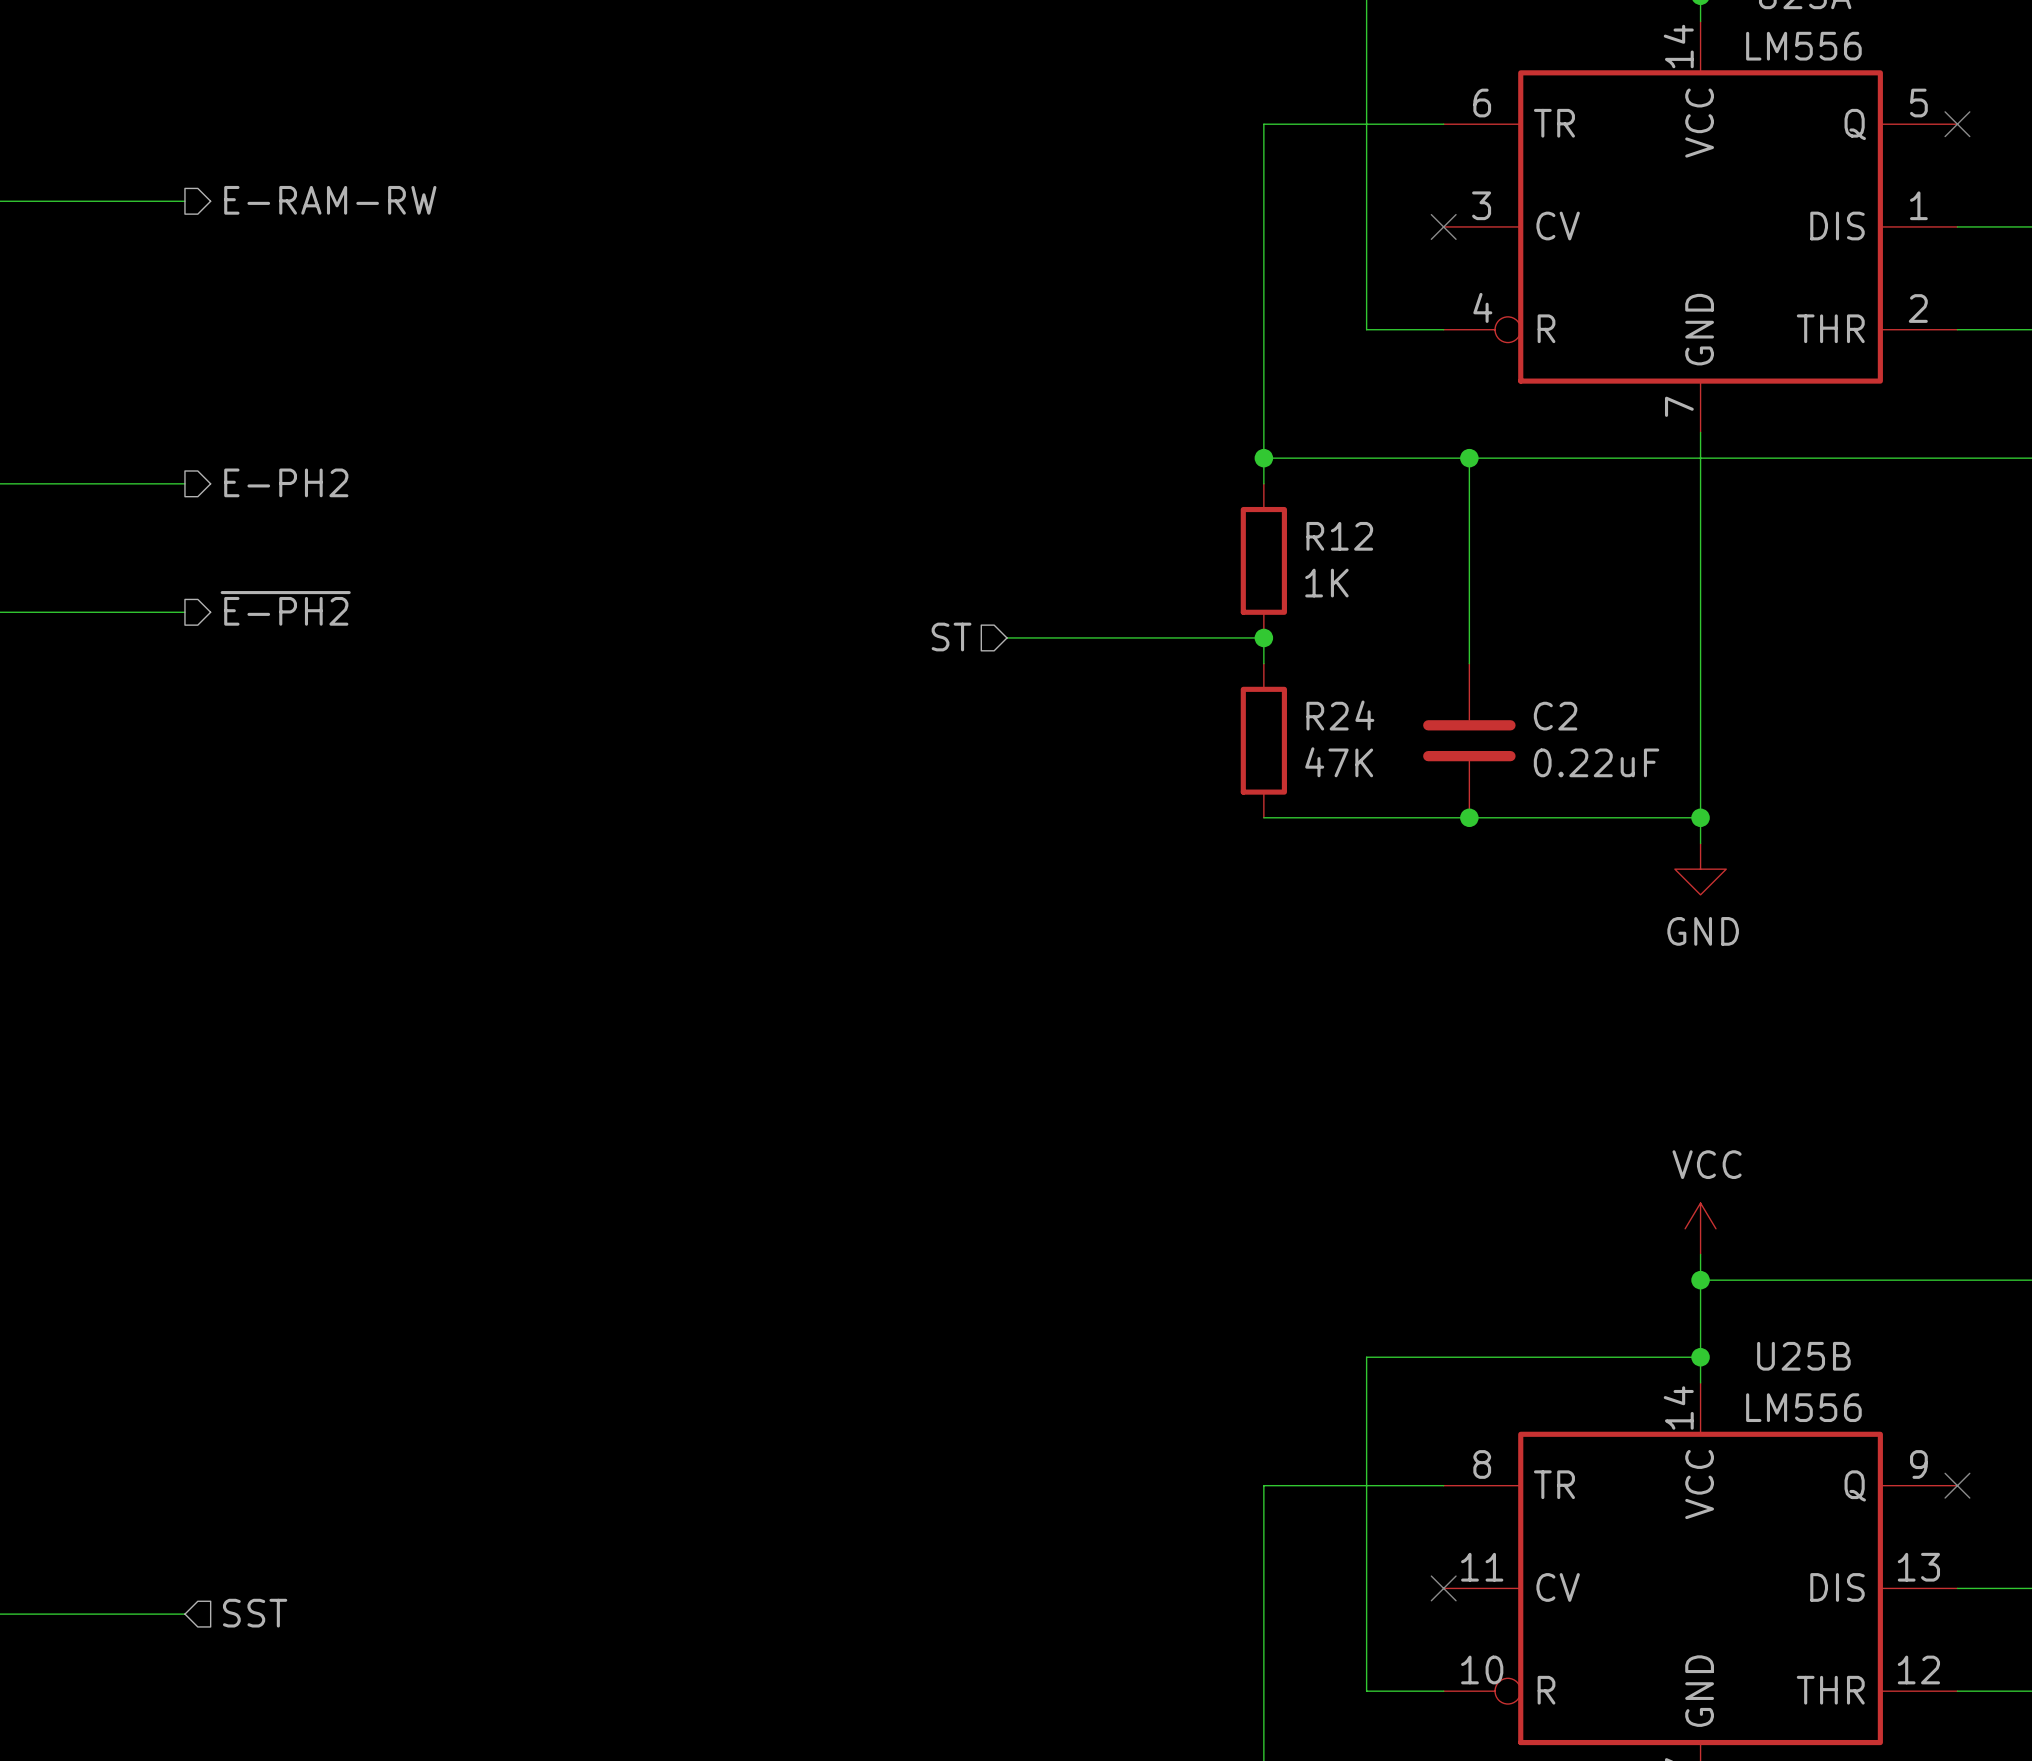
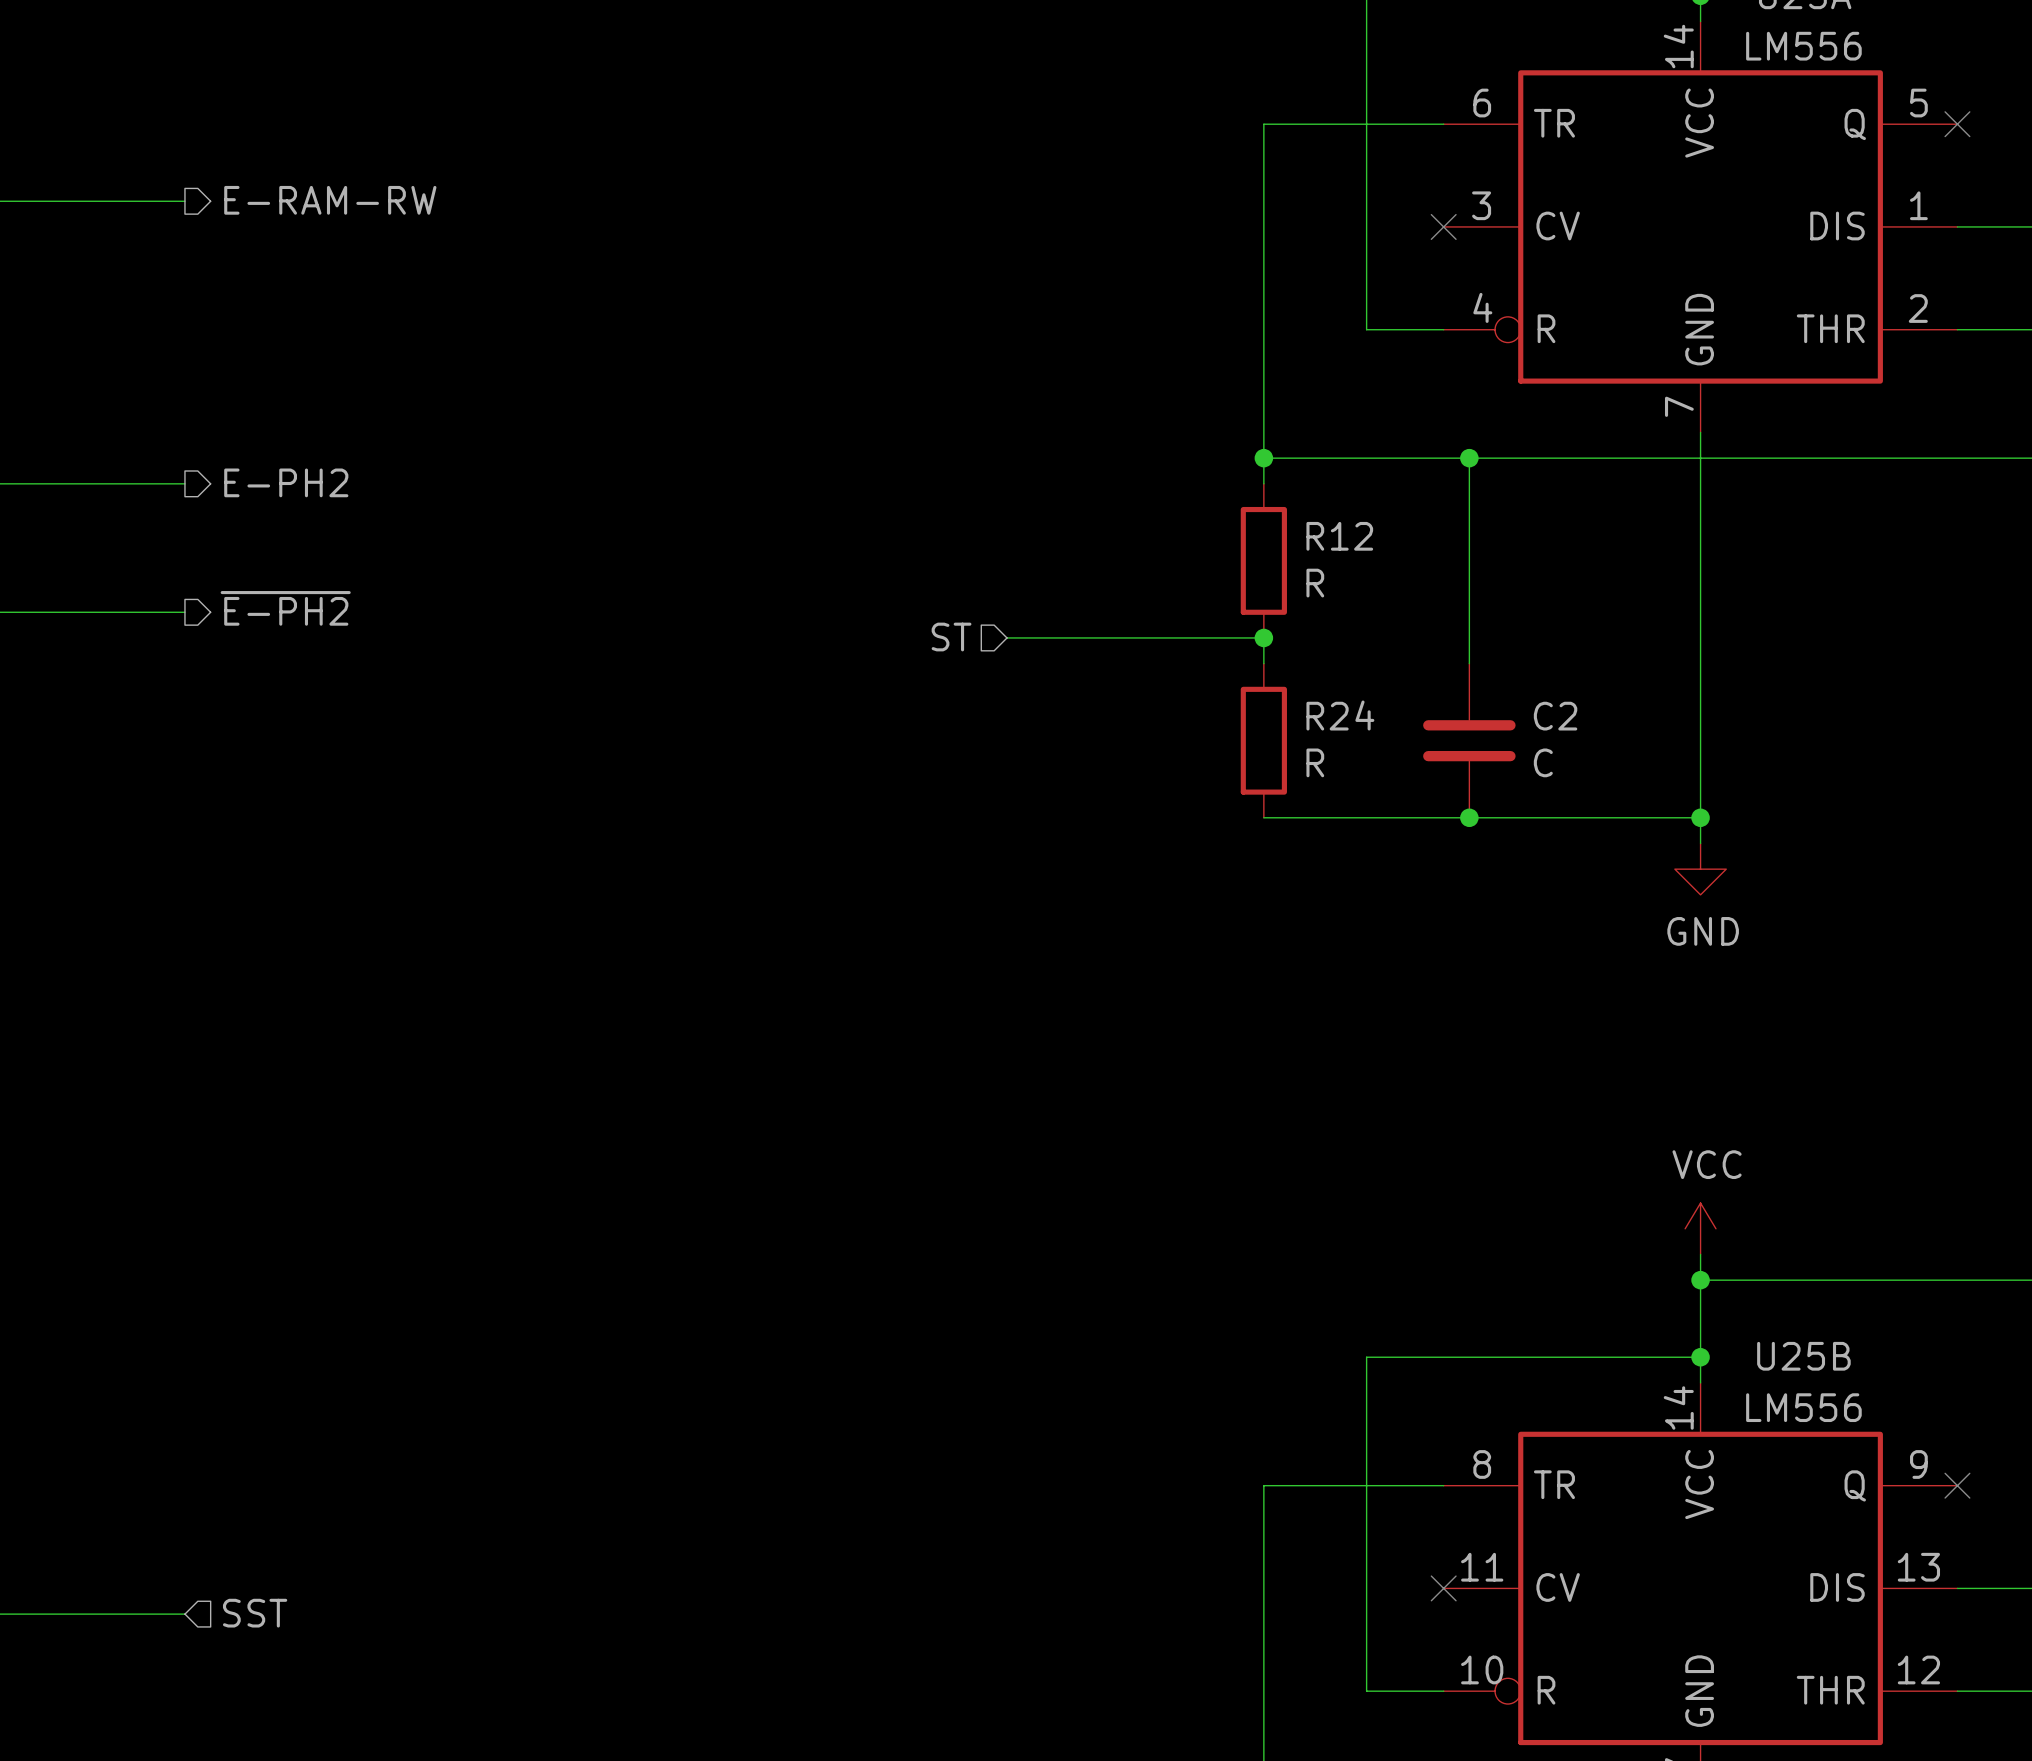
R12 value: 1K (1326, 583) -> R (1315, 583)
R24 value: 47K (1339, 762) -> R (1315, 762)
C2 value: 0.22uF (1596, 762) -> C (1543, 762)

